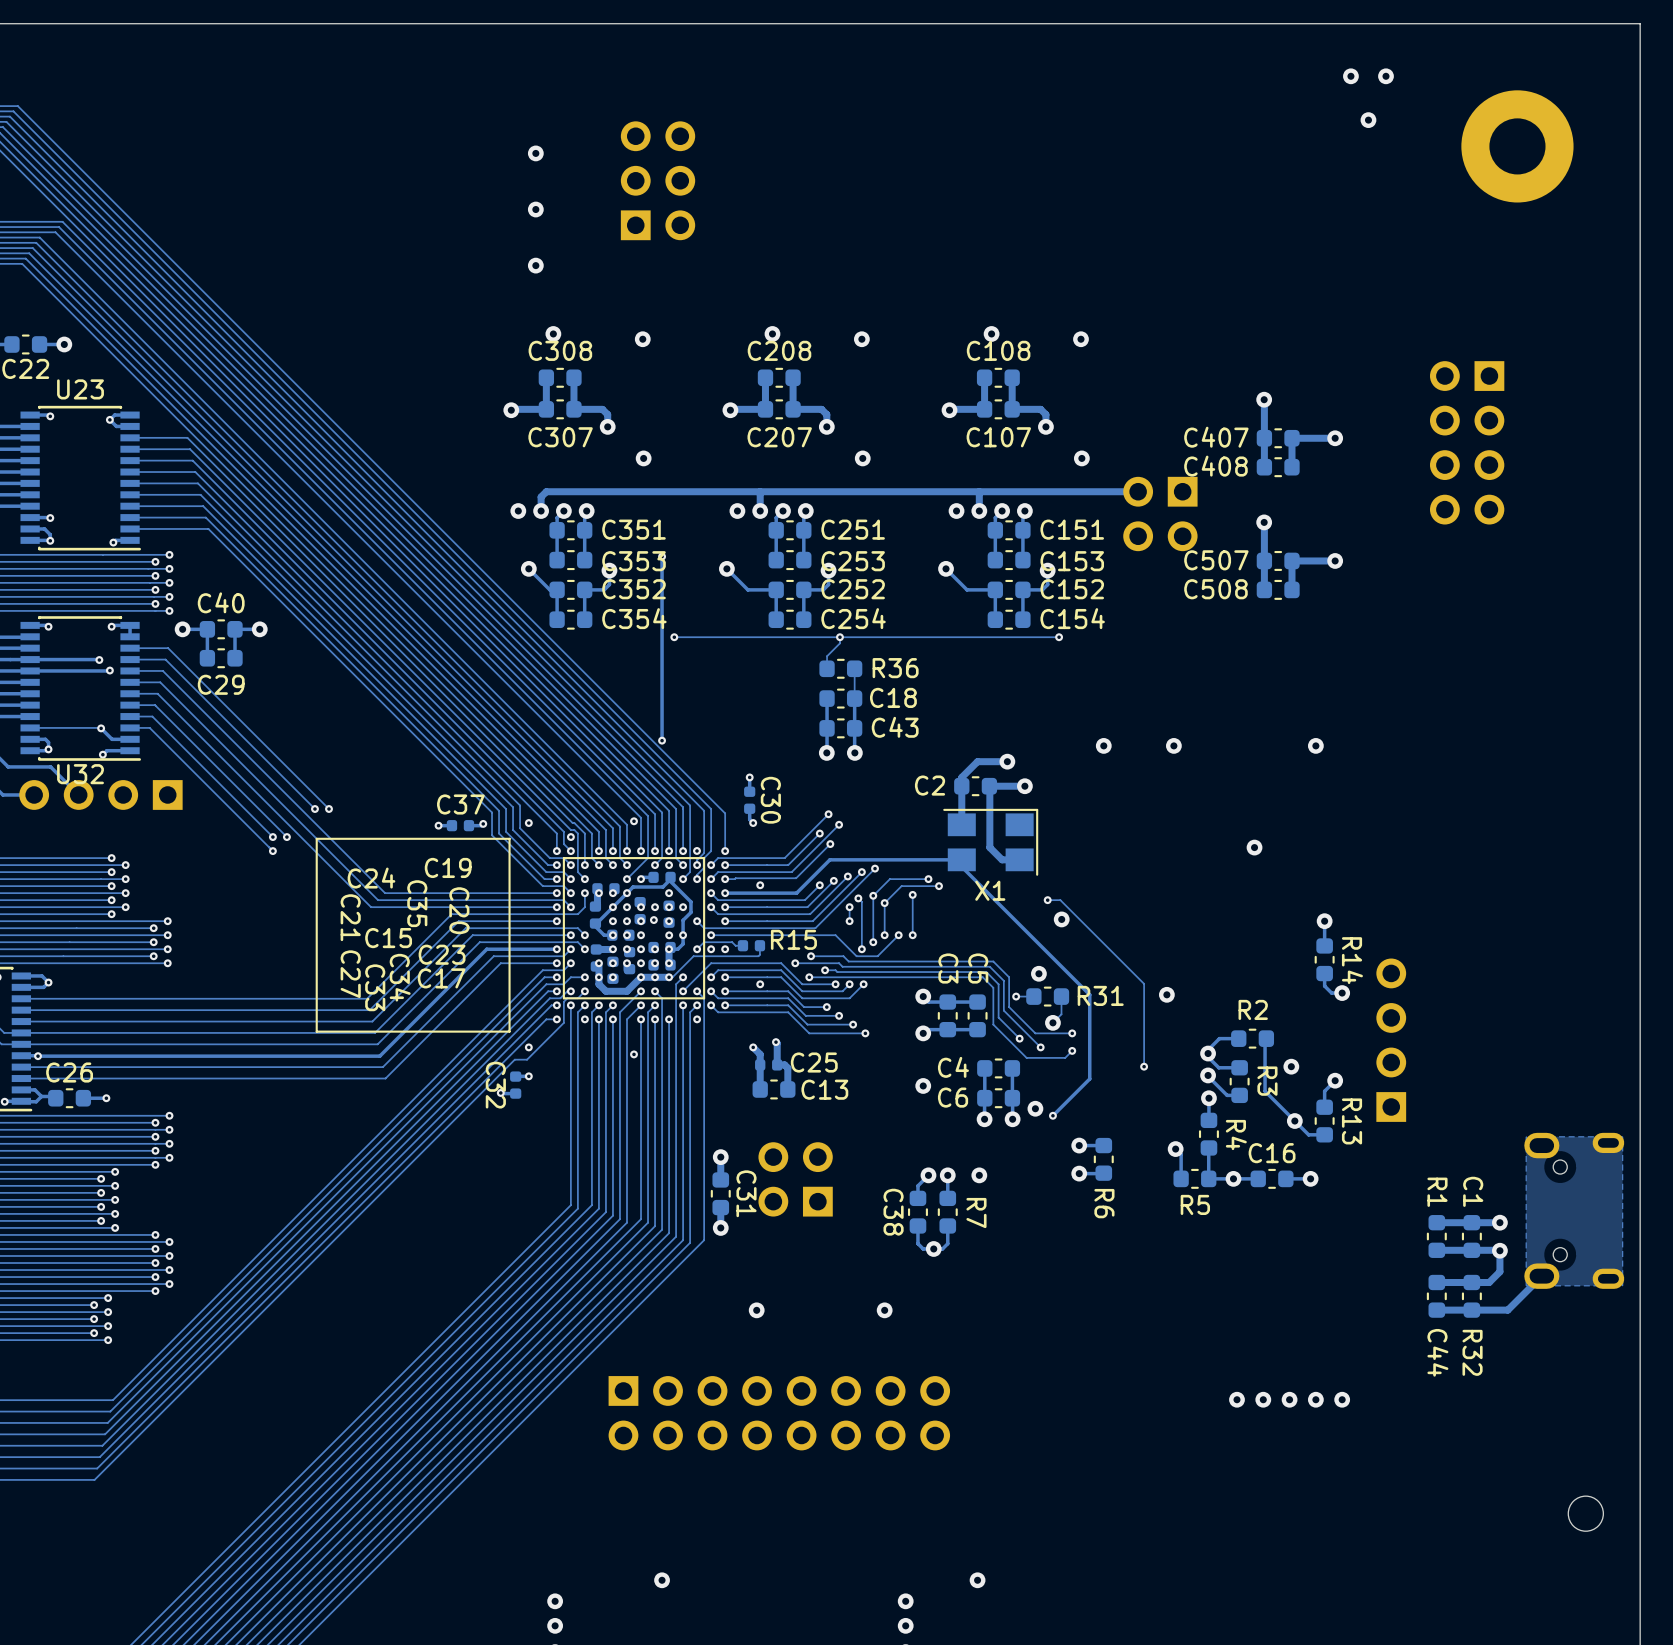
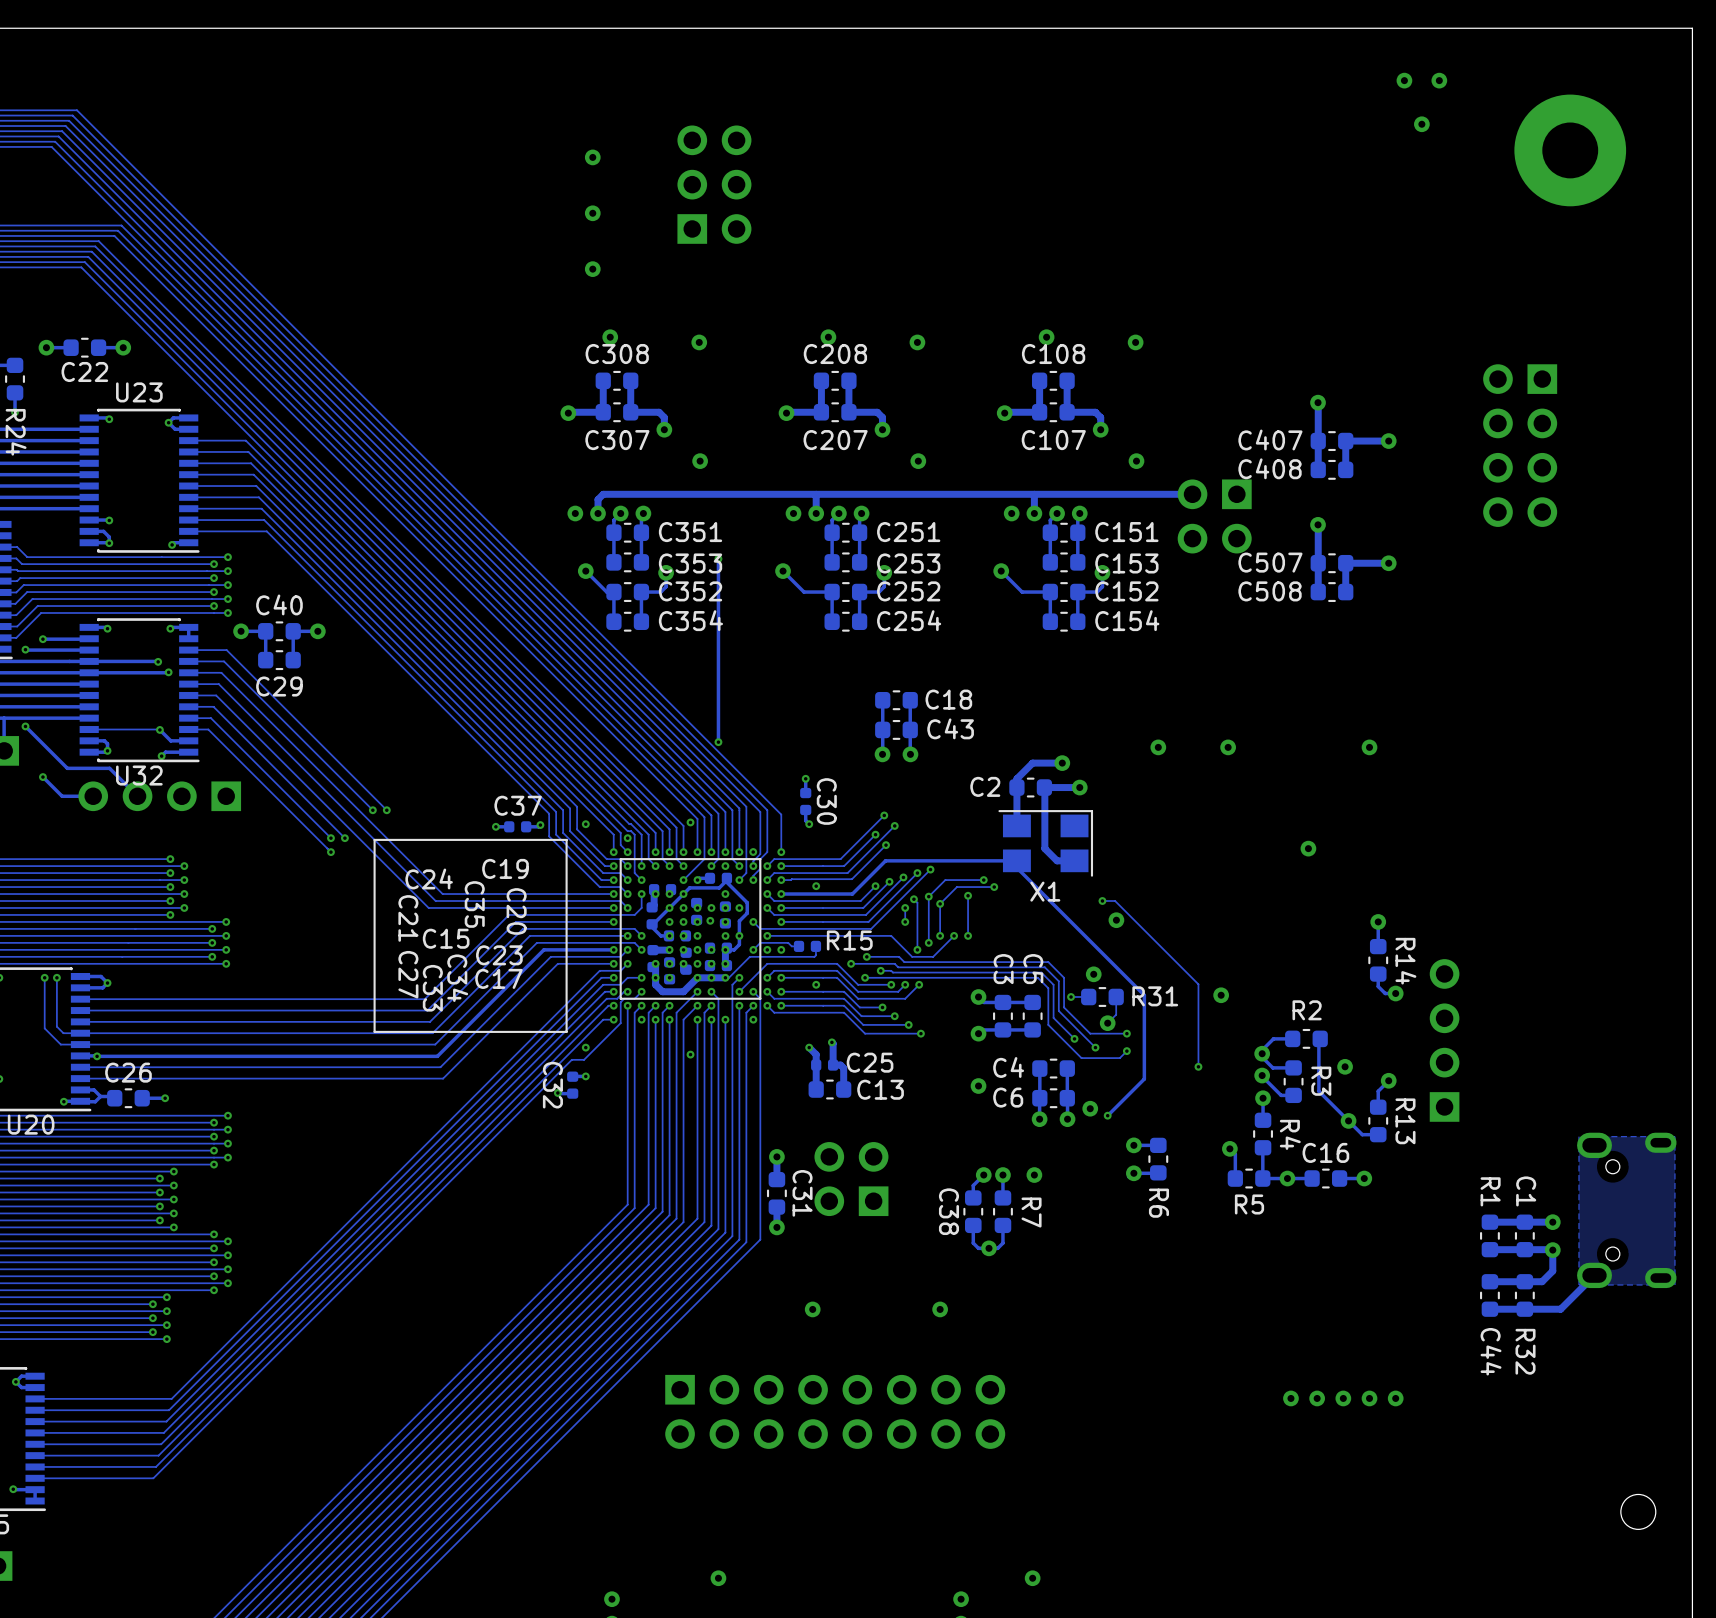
via: (674, 637) -> none
track: (839, 637) (839, 643) (827, 656) (827, 668) -> none
via: (839, 637) -> none
track: (1059, 637) (674, 637) -> none
via: (1059, 637) -> none
R36: (840, 668) -> none
track: (854, 668) (854, 698) -> none

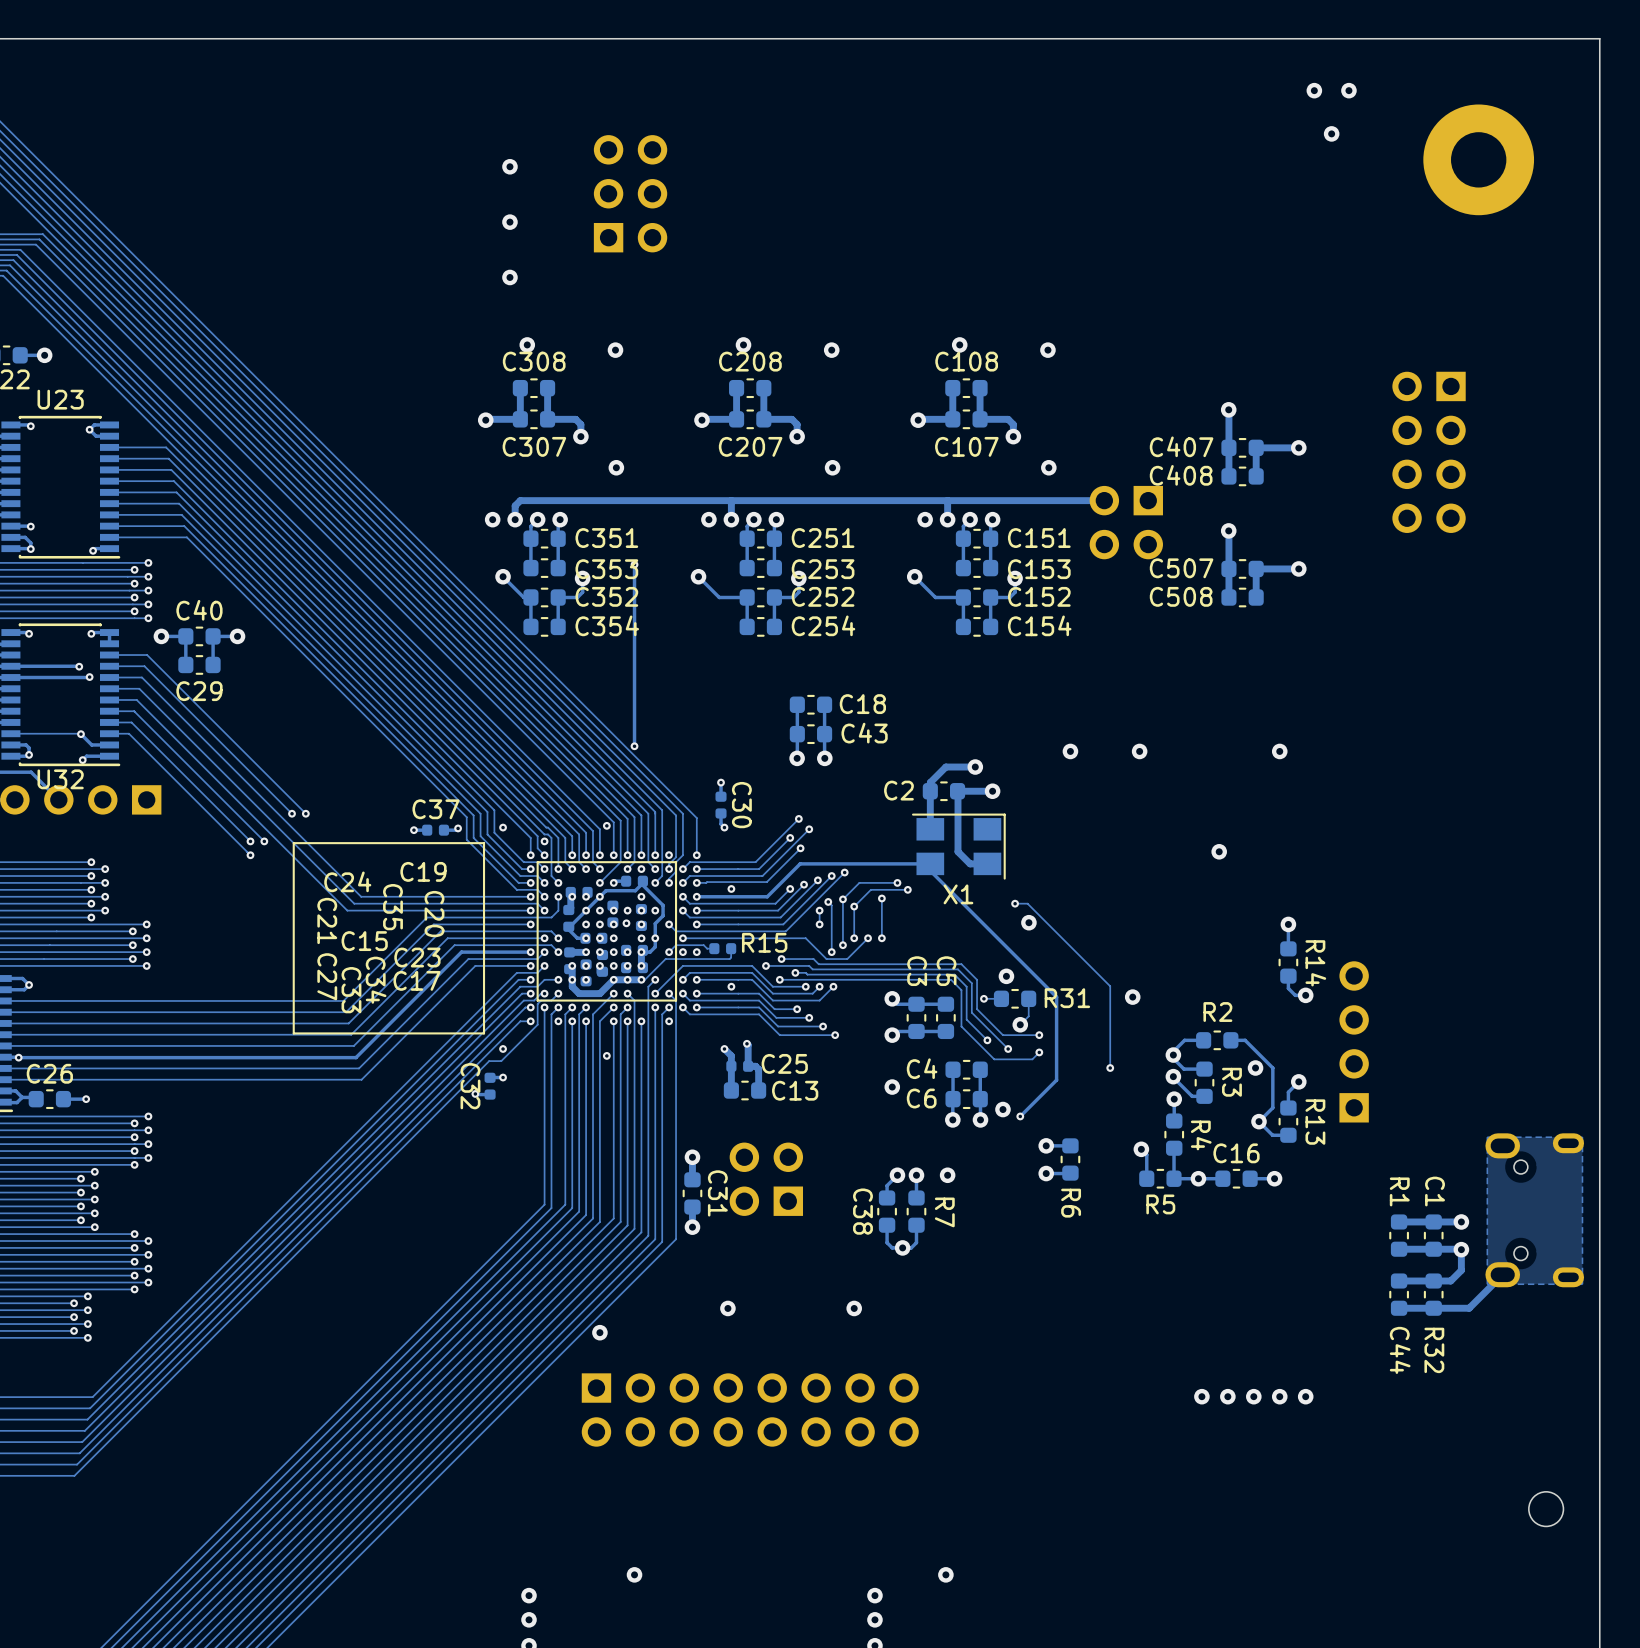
track: (1320, 1038) (1318, 1091) (1348, 1120) -> (1230, 1040) (1245, 1040) (1272, 1068) (1272, 1107) (1258, 1121)
via: none -> (599, 1332)

